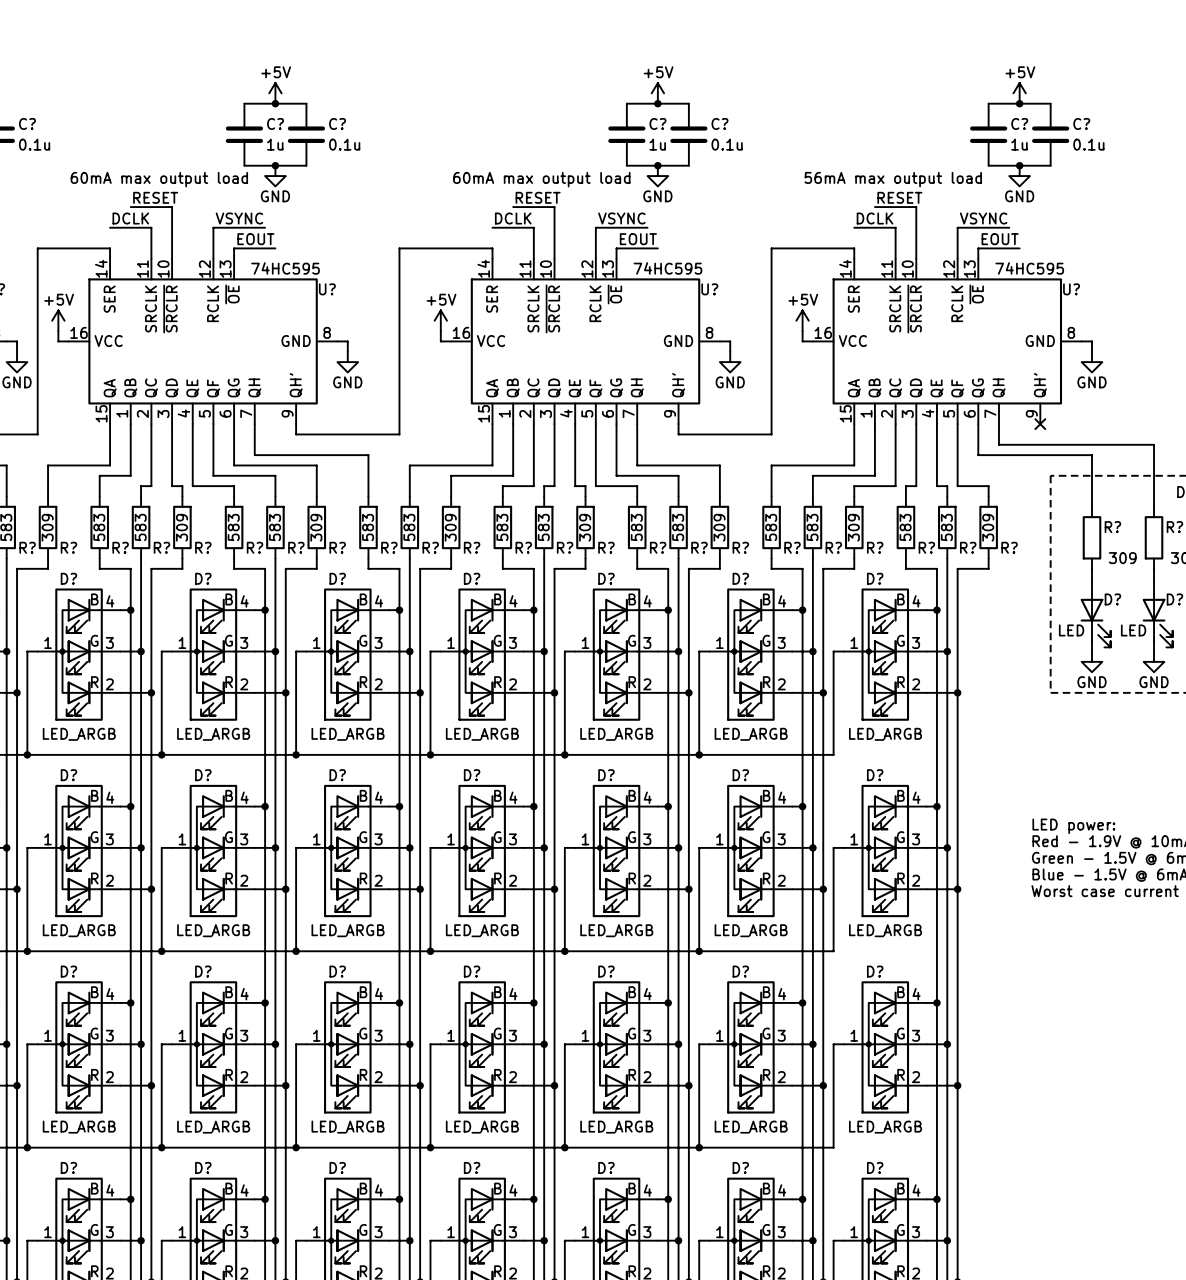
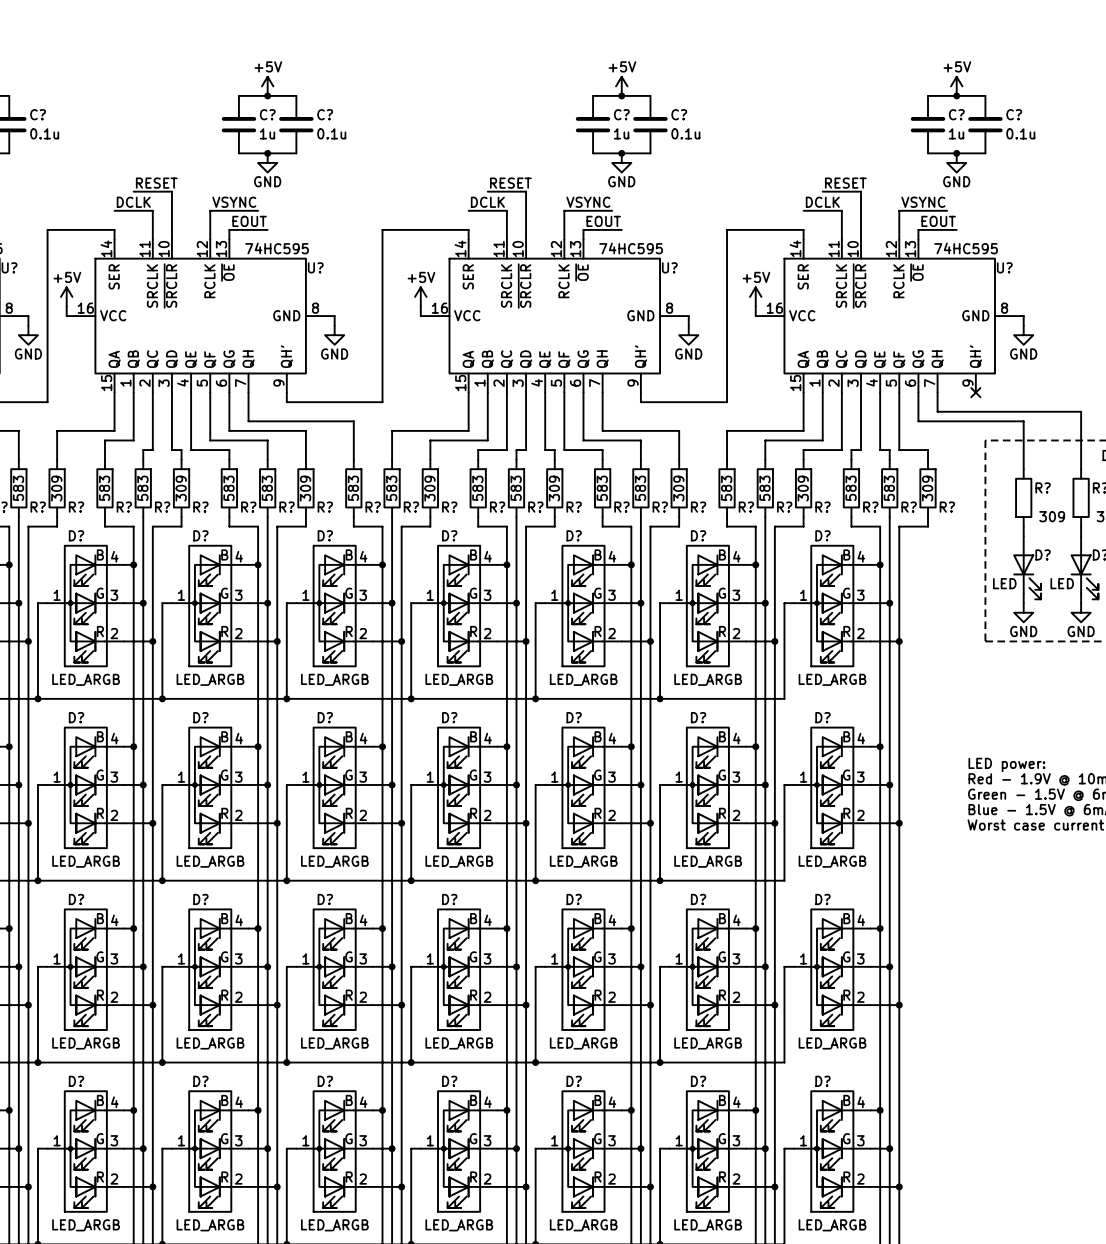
text: 60mA max output load (159, 179) -> none
text: 60mA max output load (541, 179) -> none
text: 56mA max output load (893, 179) -> none

